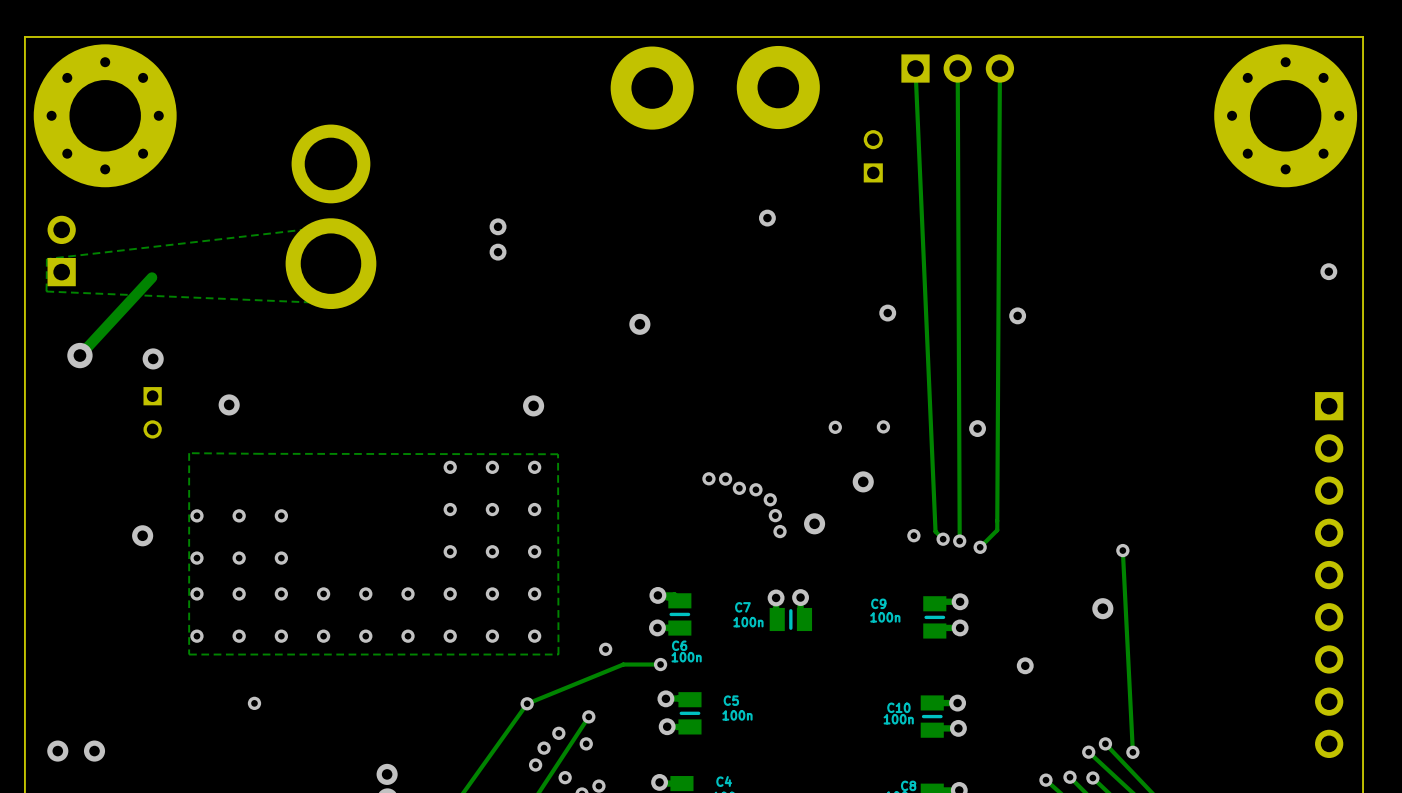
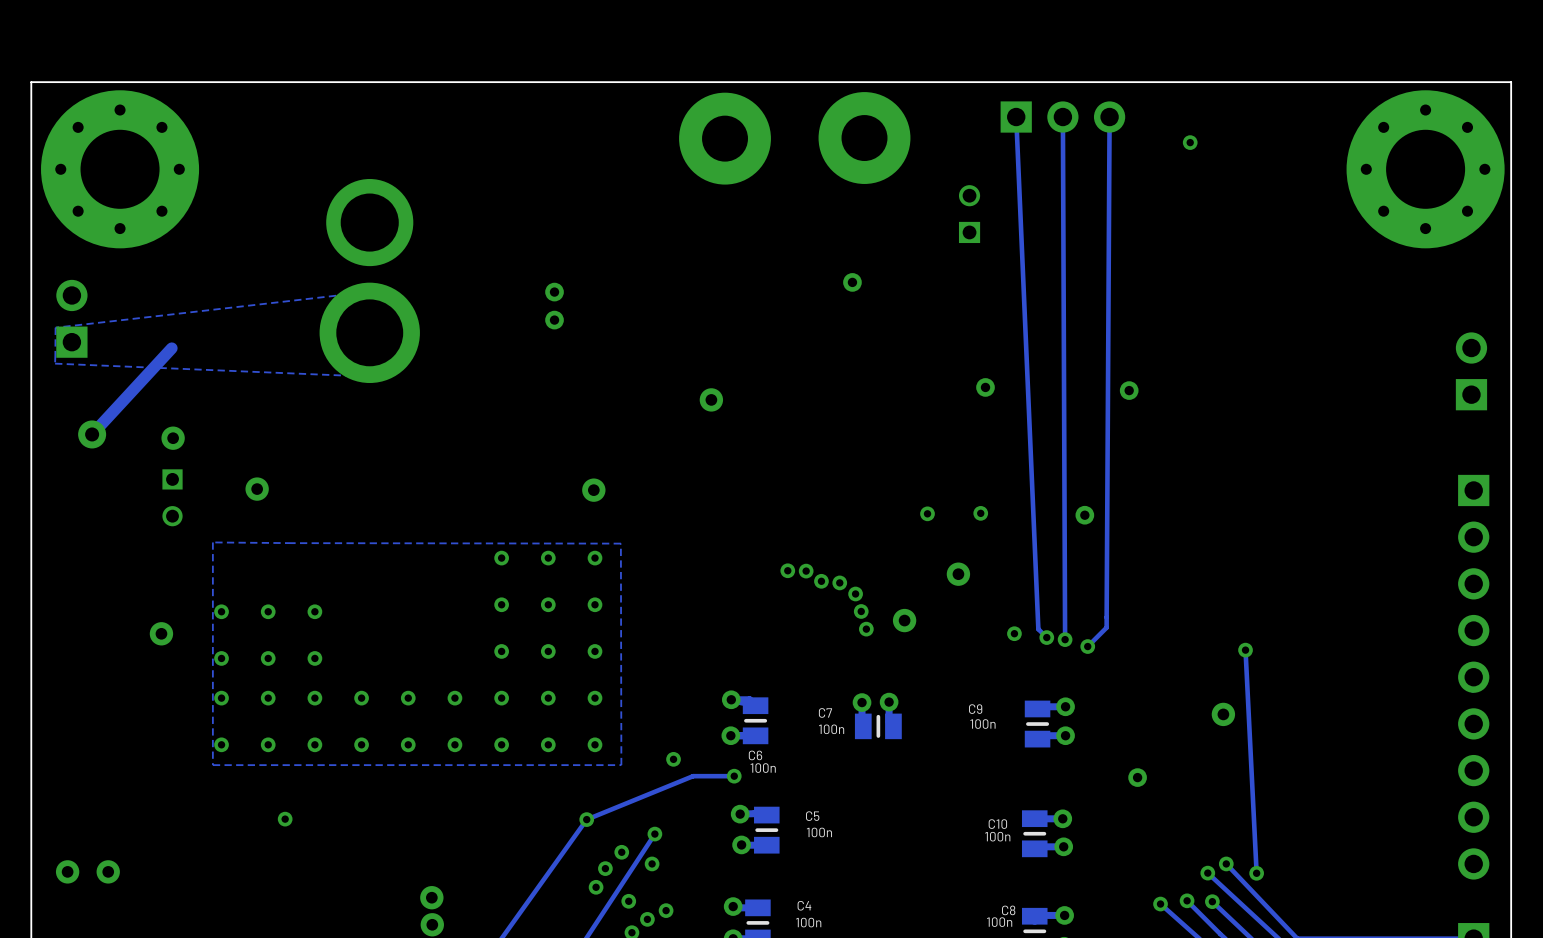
via: none -> (1190, 142)
via: (1328, 271) -> none
part: none -> (1471, 371)

